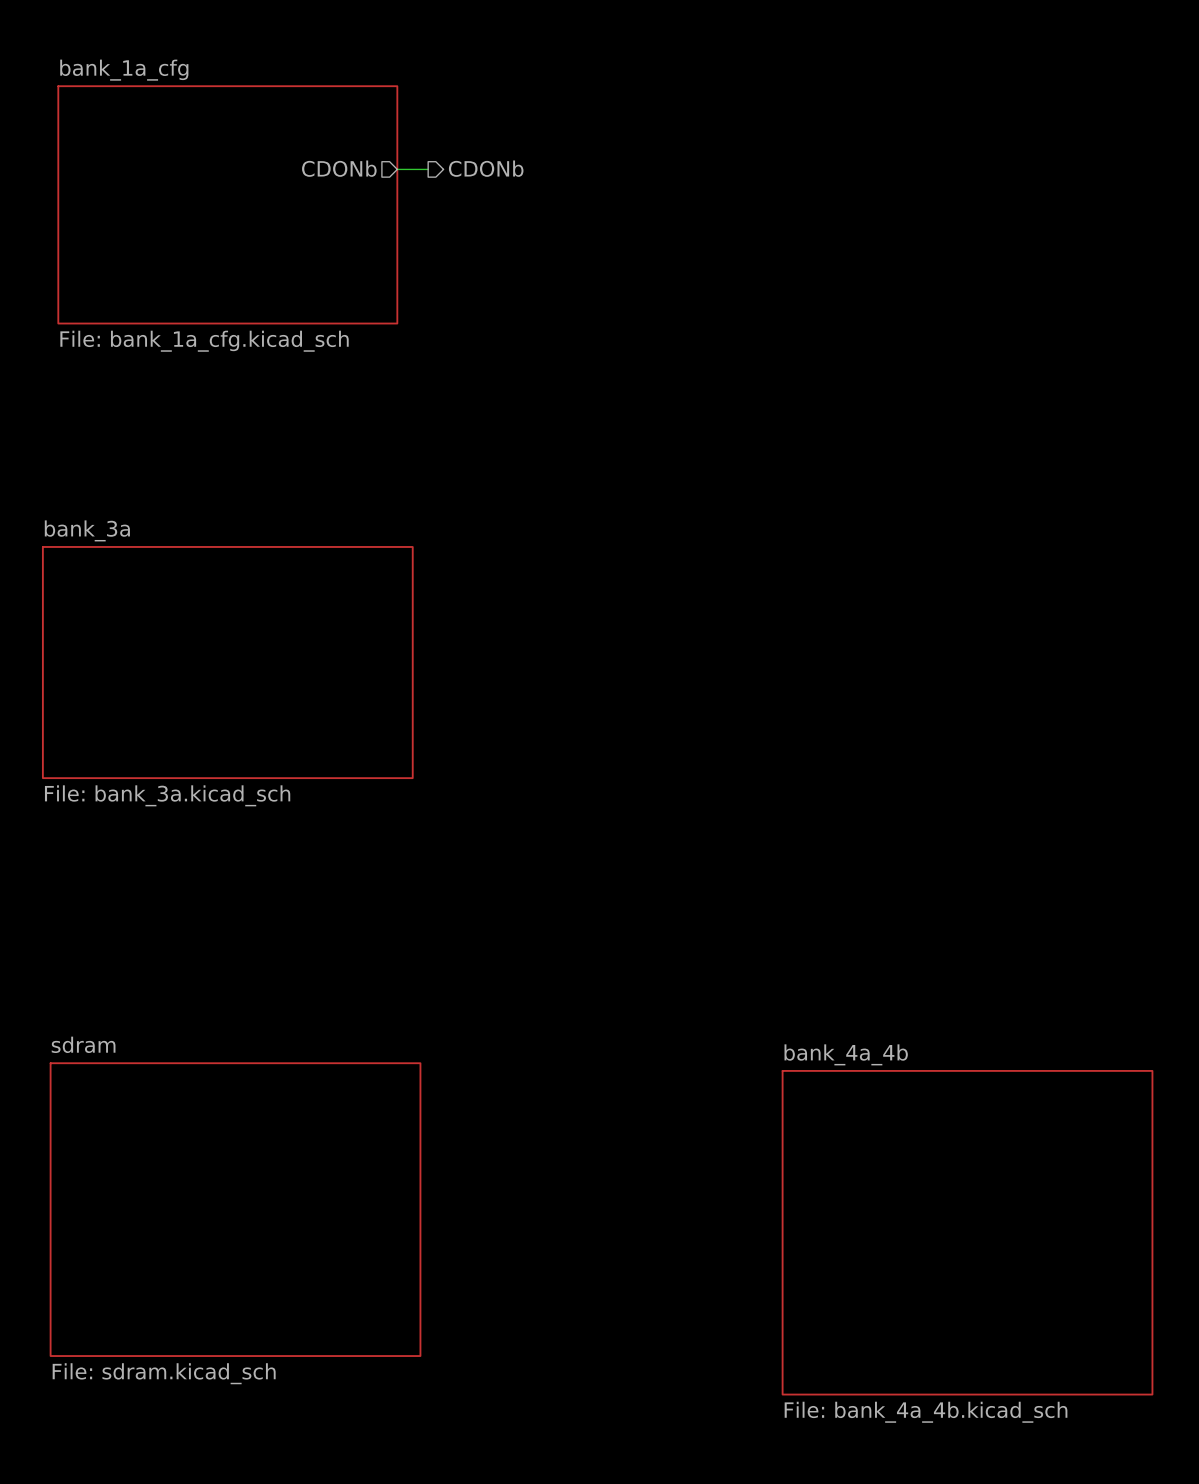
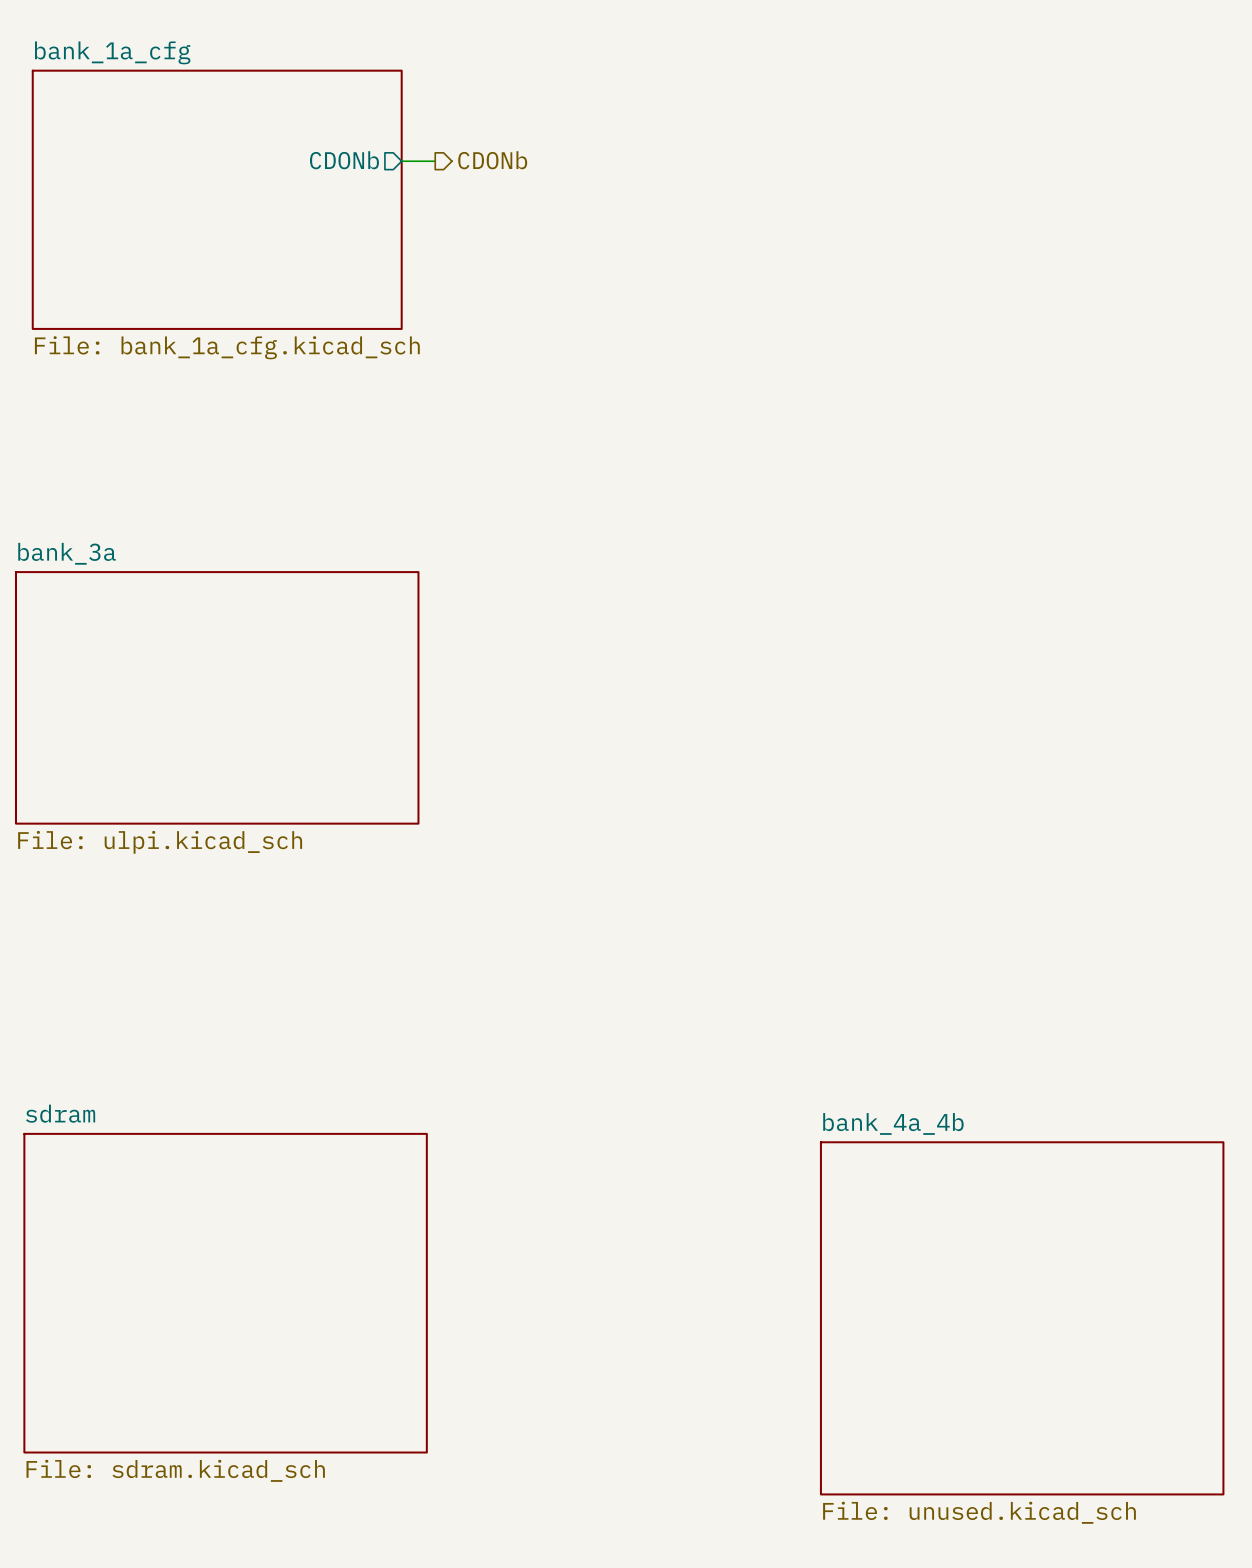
sheet bank_3a value: File: bank_3a.kicad_sch (167, 795) -> File: ulpi.kicad_sch (160, 842)
sheet bank_4a_4b value: File: bank_4a_4b.kicad_sch (926, 1412) -> File: unused.kicad_sch (979, 1512)

